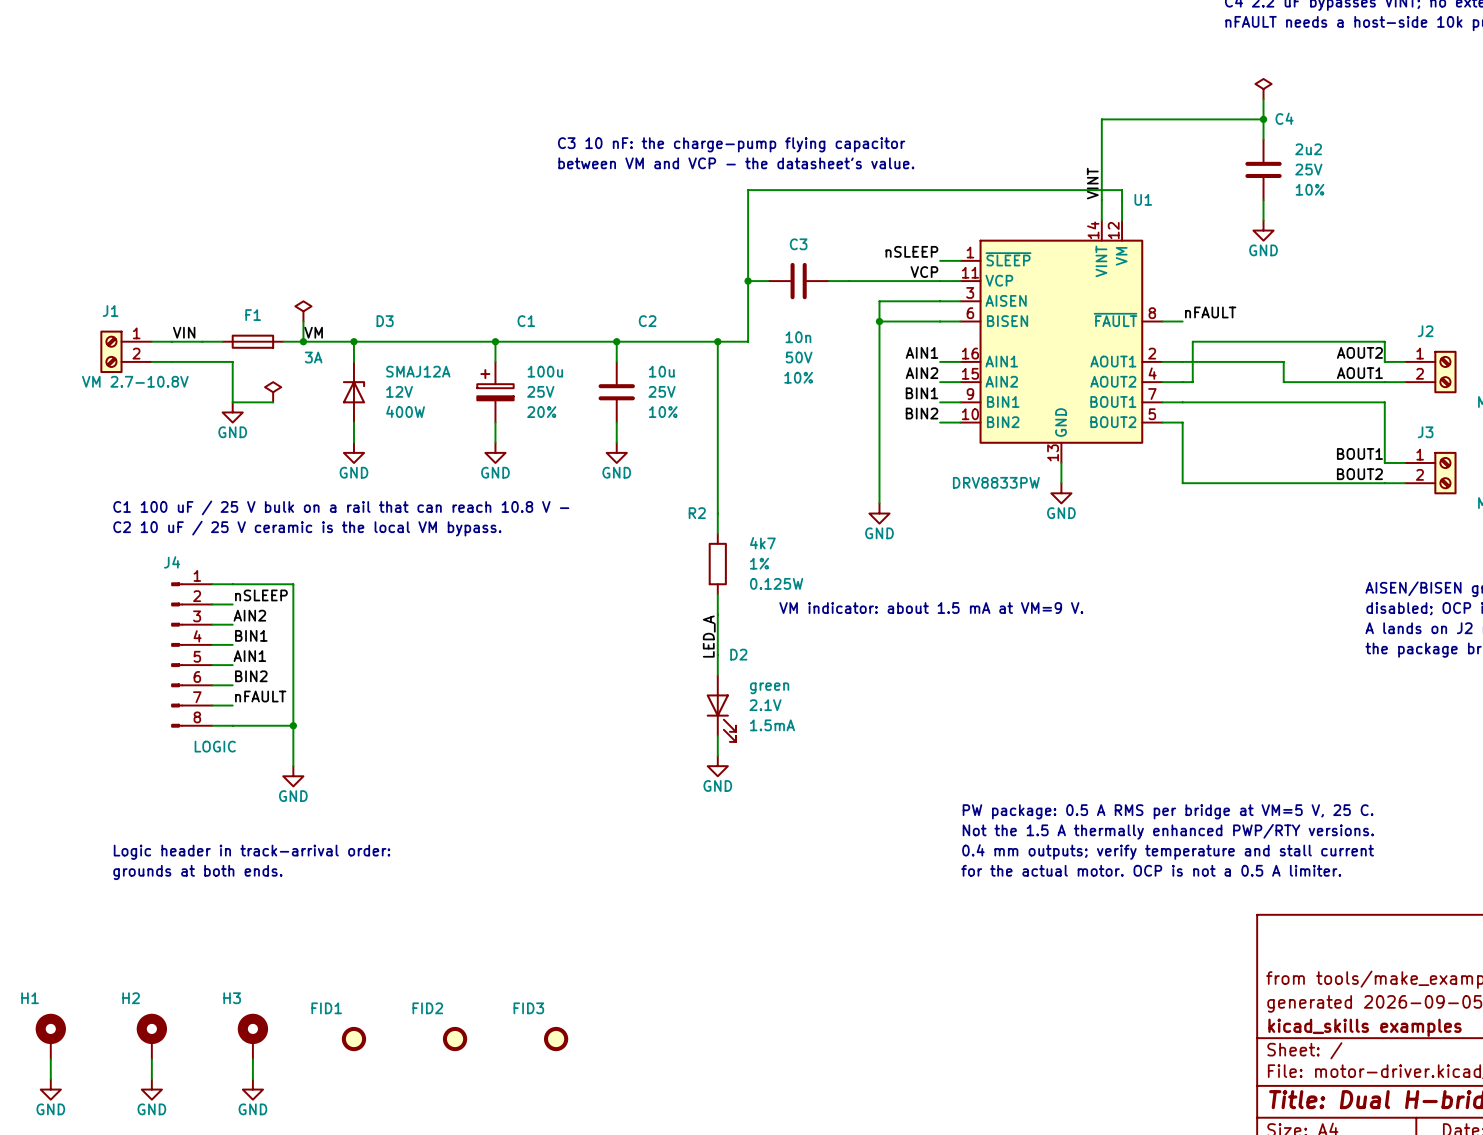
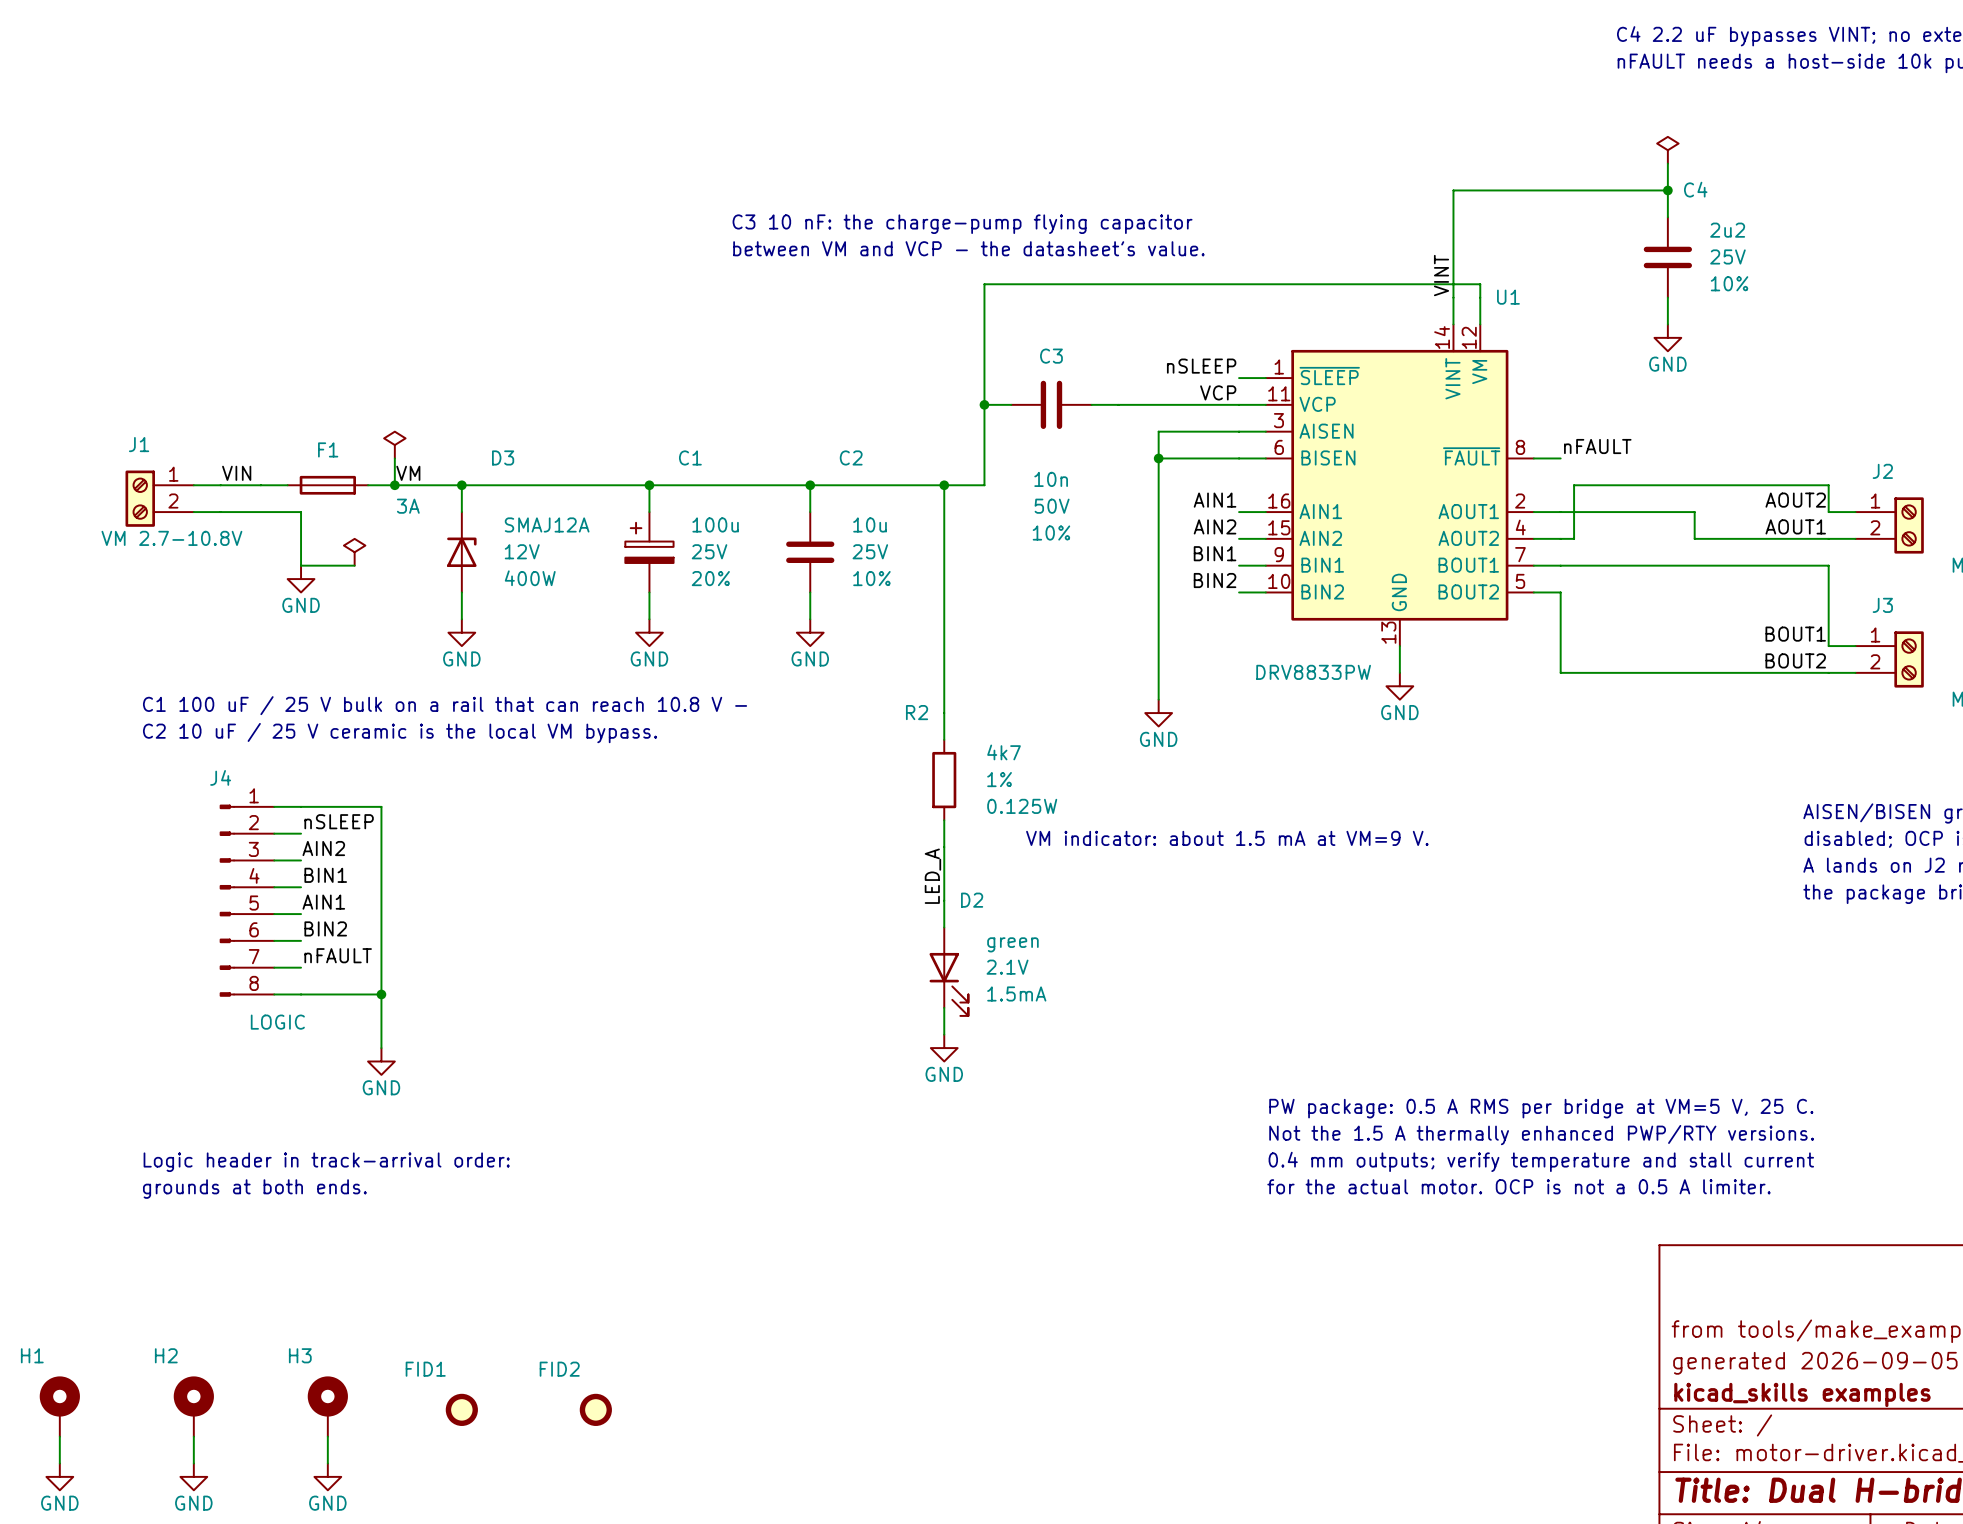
FID3: (556, 1039) -> none

